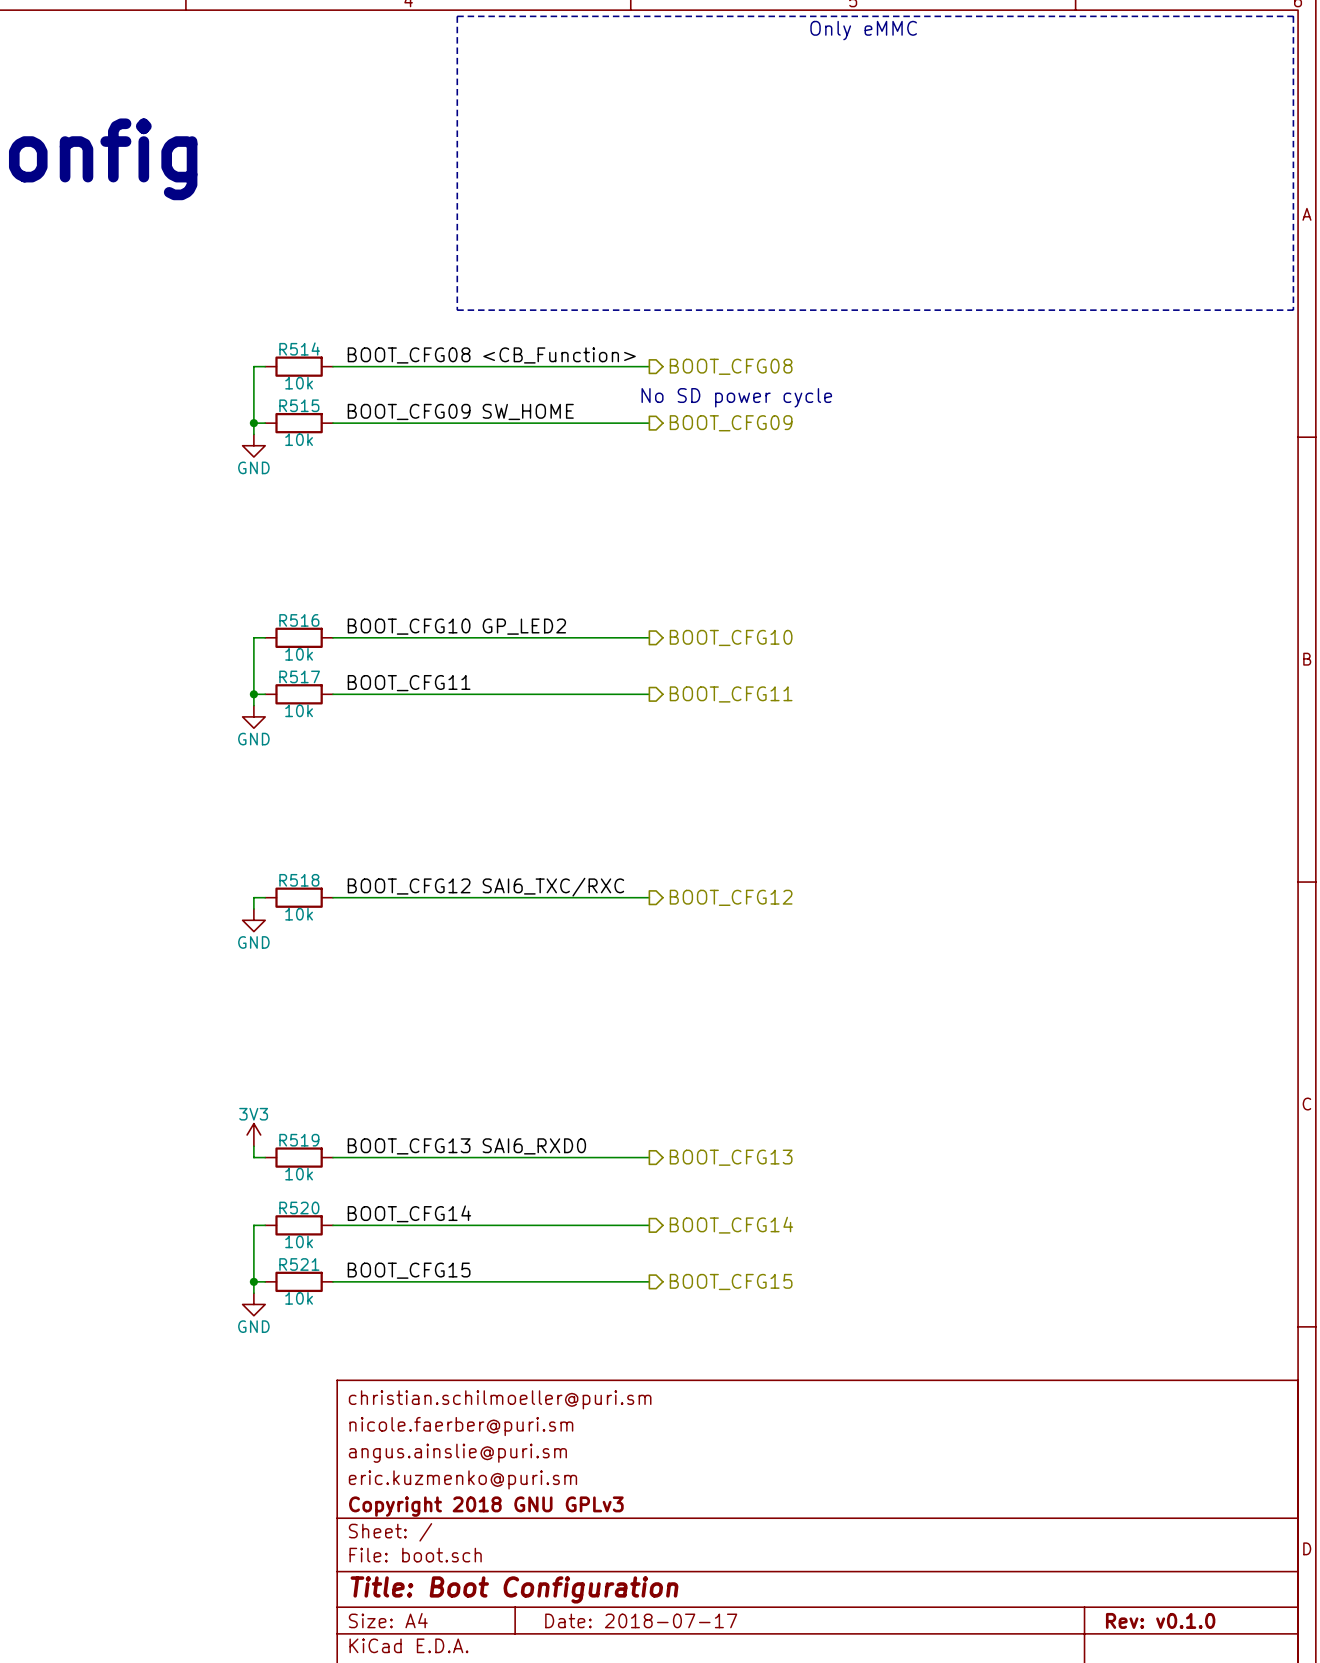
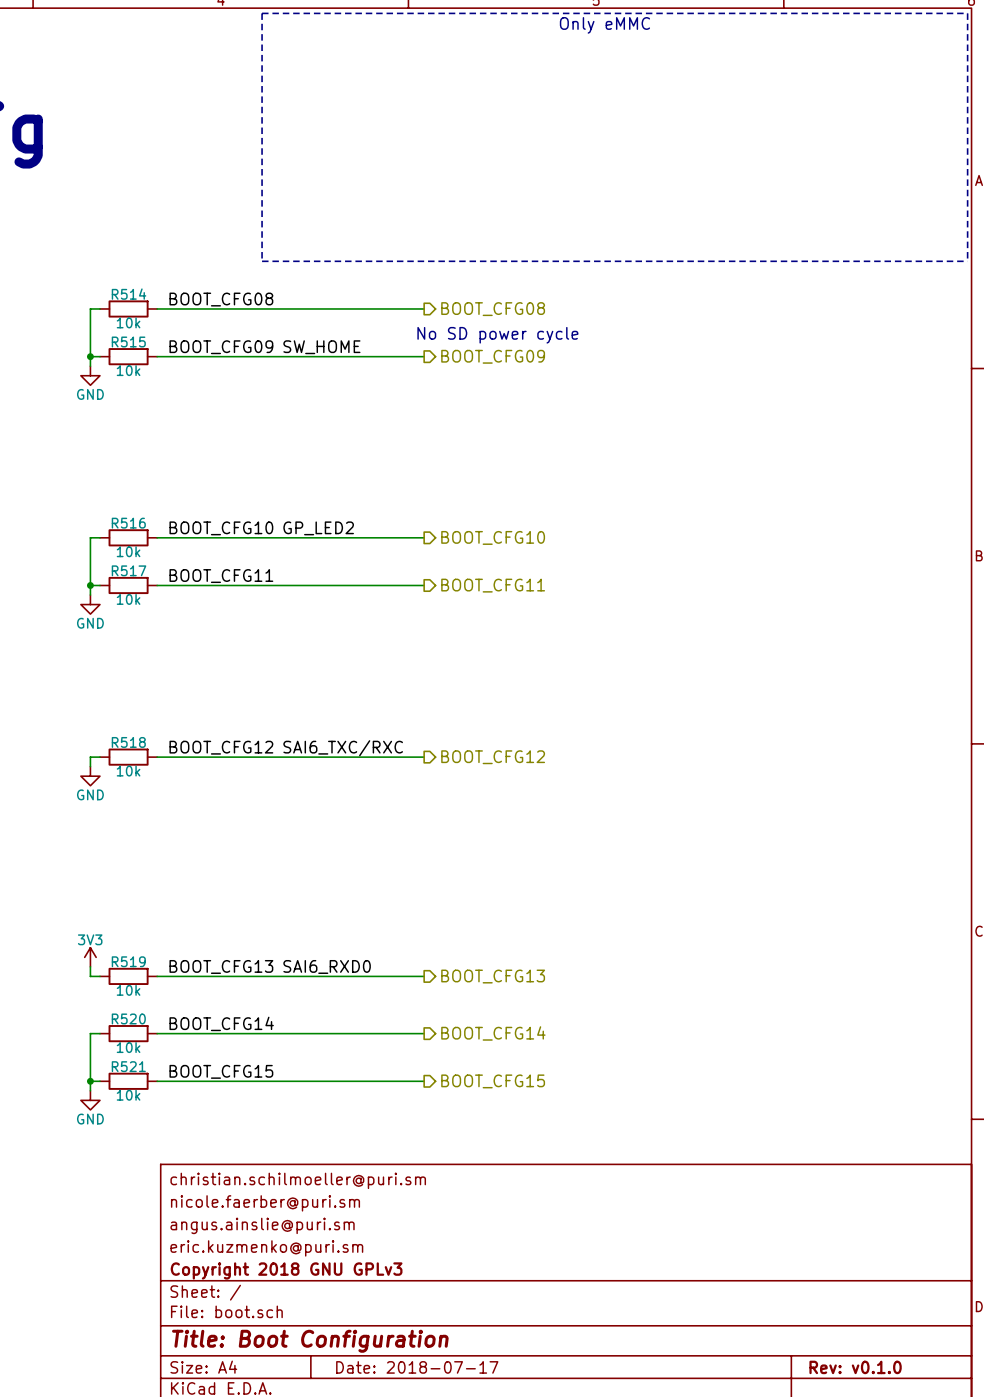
label: <CB_Function> (559, 355) -> none

